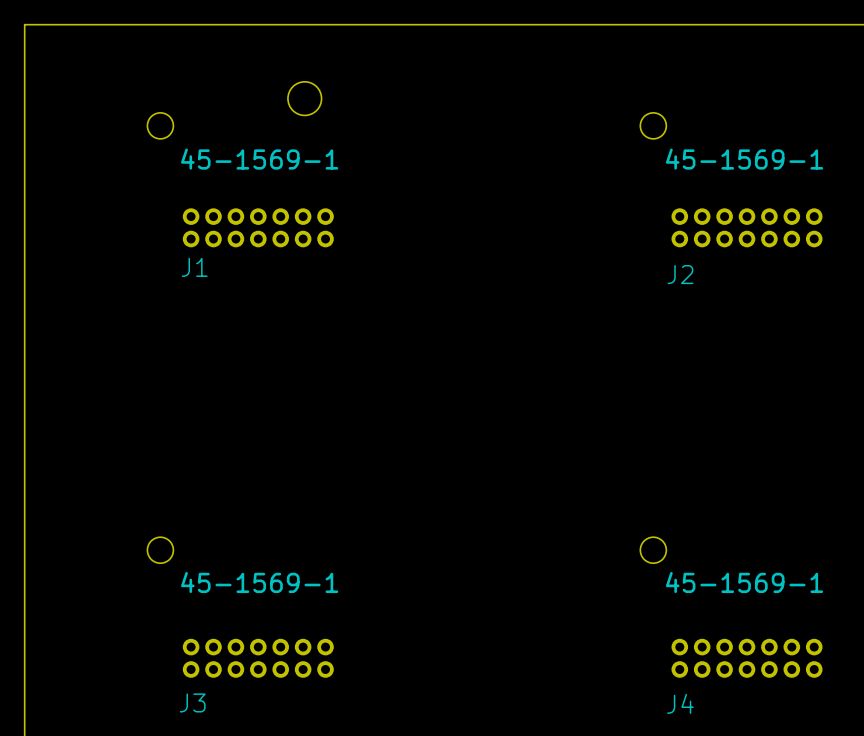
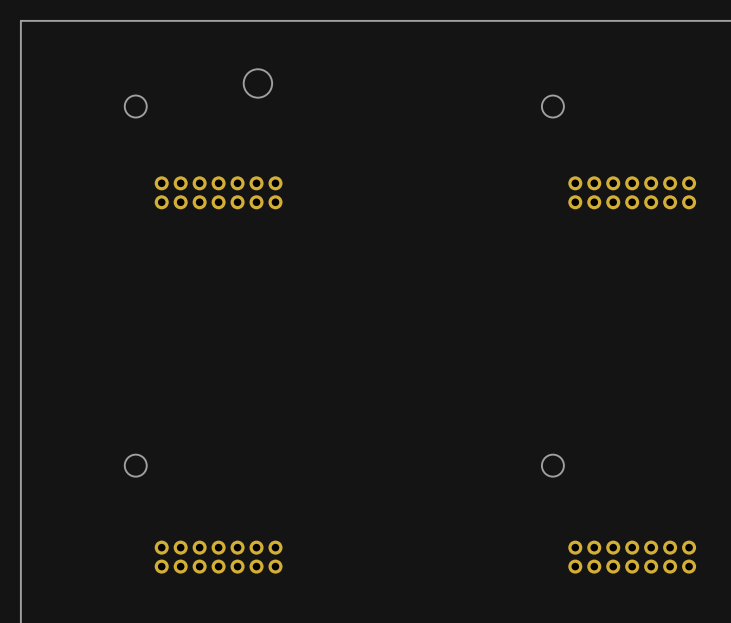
text: 45-1569-1 (259, 159) -> none
text: 45-1569-1 (744, 159) -> none
J1 name: J1 (194, 267) -> none
J2 name: J2 (680, 274) -> none
text: 45-1569-1 (259, 582) -> none
text: 45-1569-1 (744, 582) -> none
J3 name: J3 (192, 702) -> none
J4 name: J4 (680, 703) -> none

